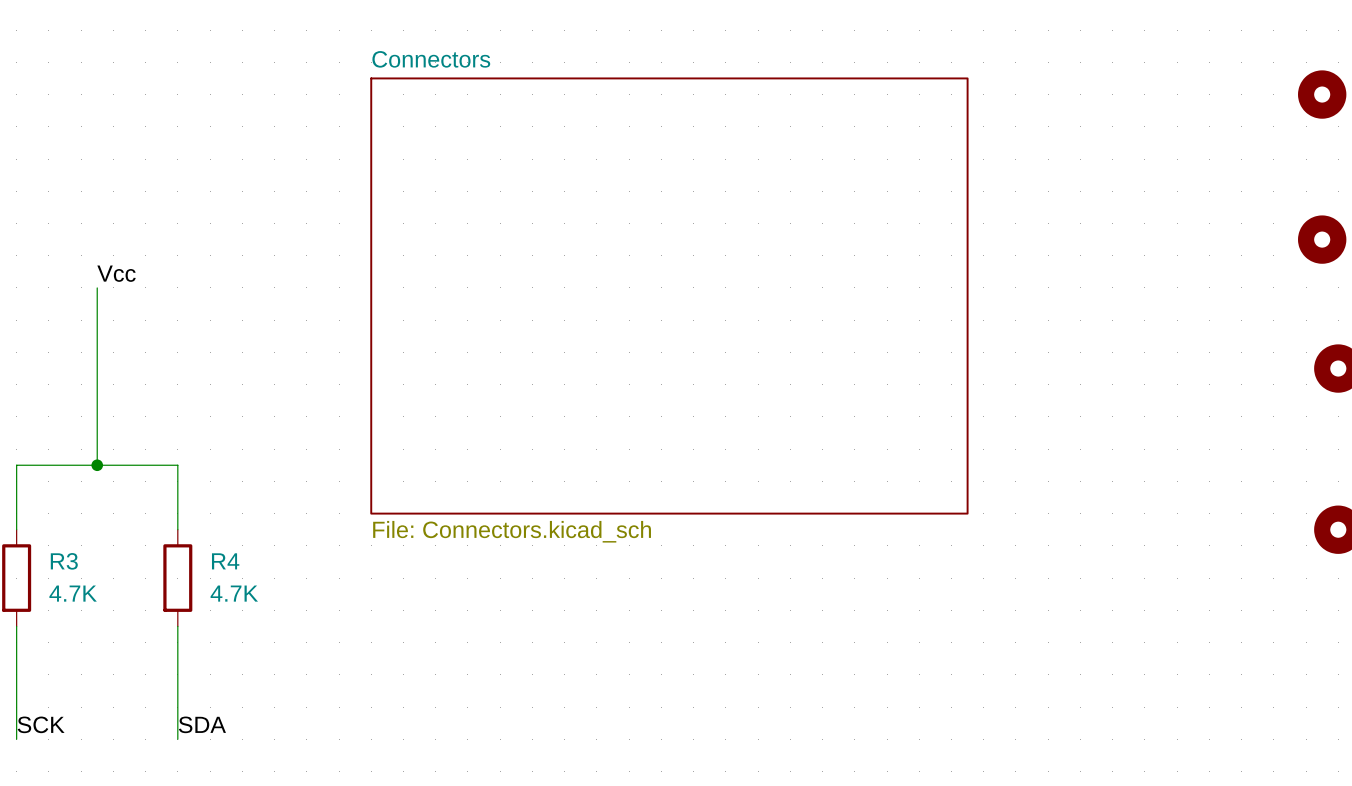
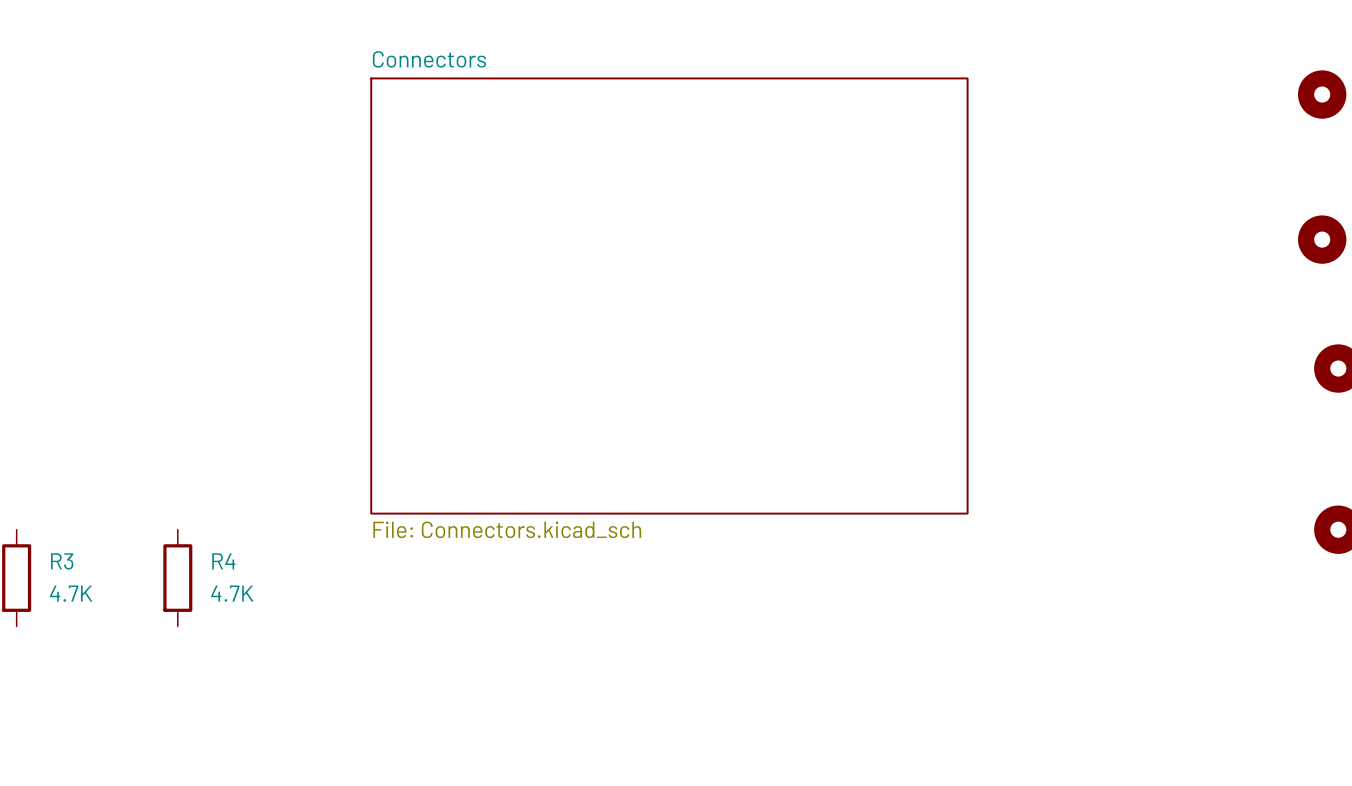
label: Vcc (116, 273) -> none
wire: (97, 287) (97, 465) -> none
junction: (97, 465) -> none
wire: (16, 529) (16, 465) (177, 465) (177, 529) -> none
wire: (16, 626) (16, 739) -> none
wire: (177, 626) (177, 739) -> none
label: SCK (41, 724) -> none
label: SDA (202, 724) -> none

